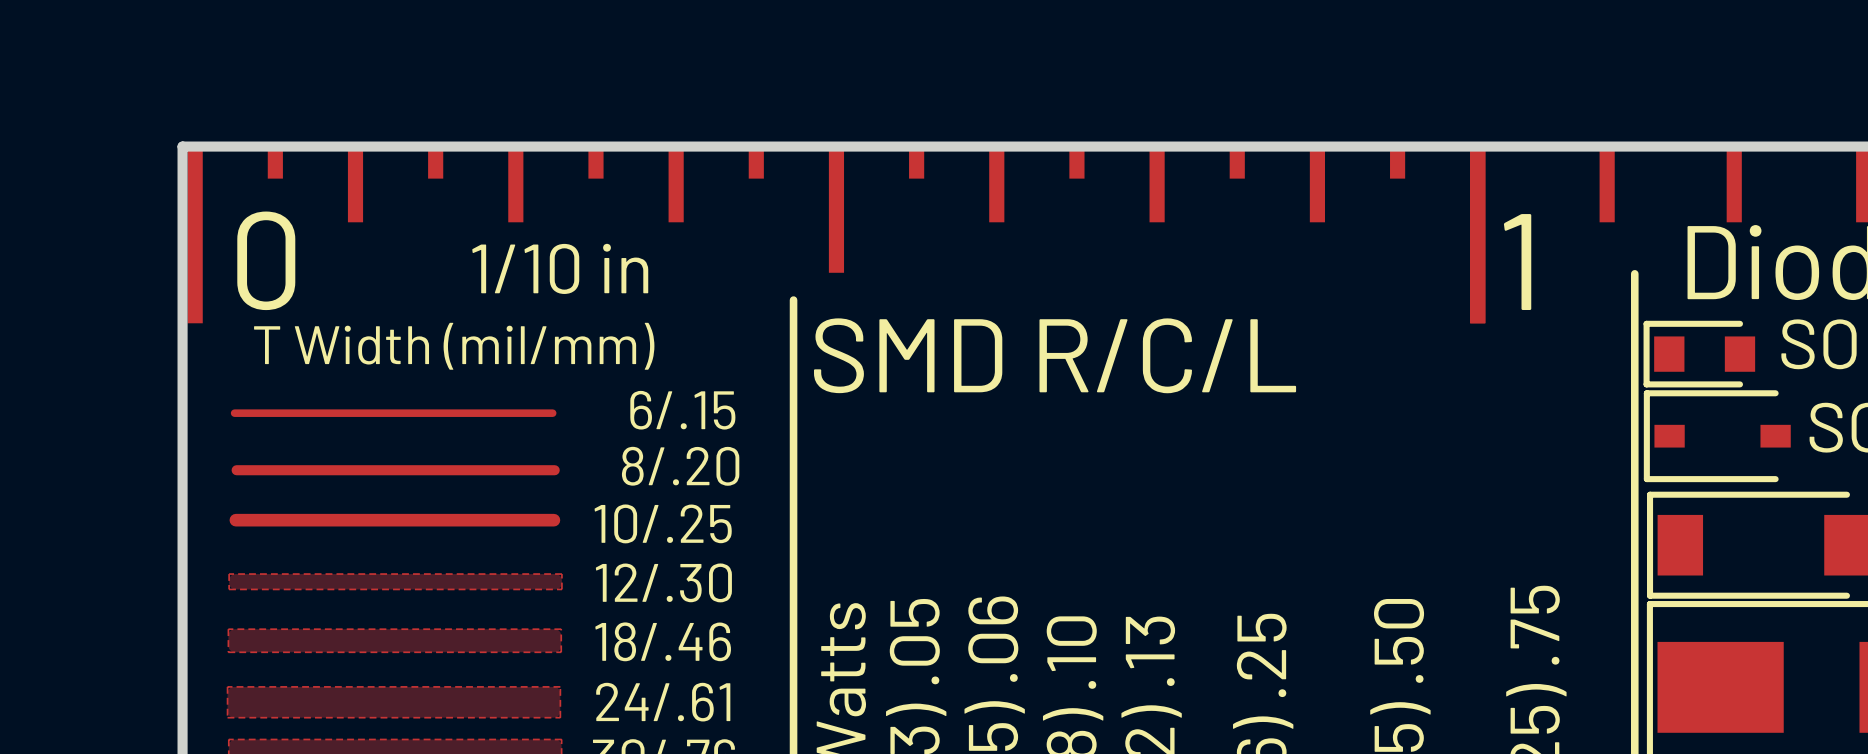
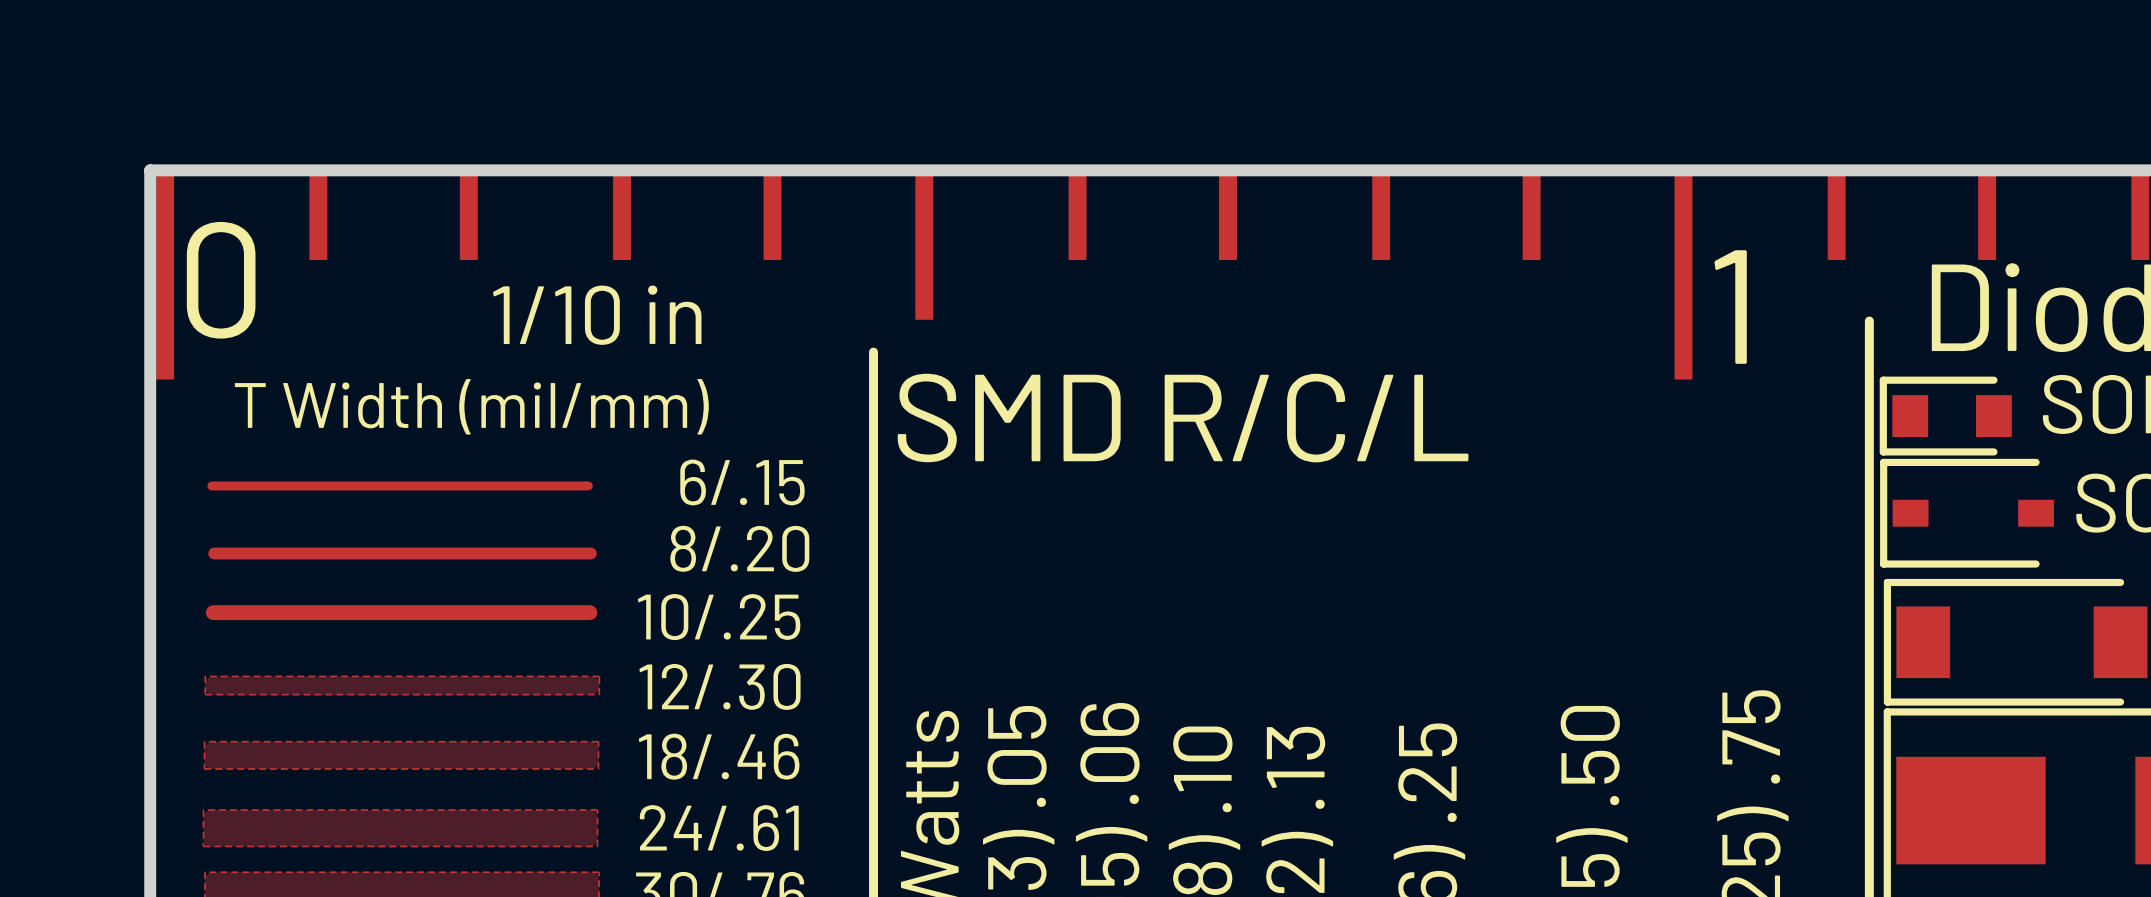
drawing: [187, 146, 1486, 324] -> none
drawing: none -> [156, 170, 1541, 380]
text position: 0 (266, 260) -> 0 (221, 280)

